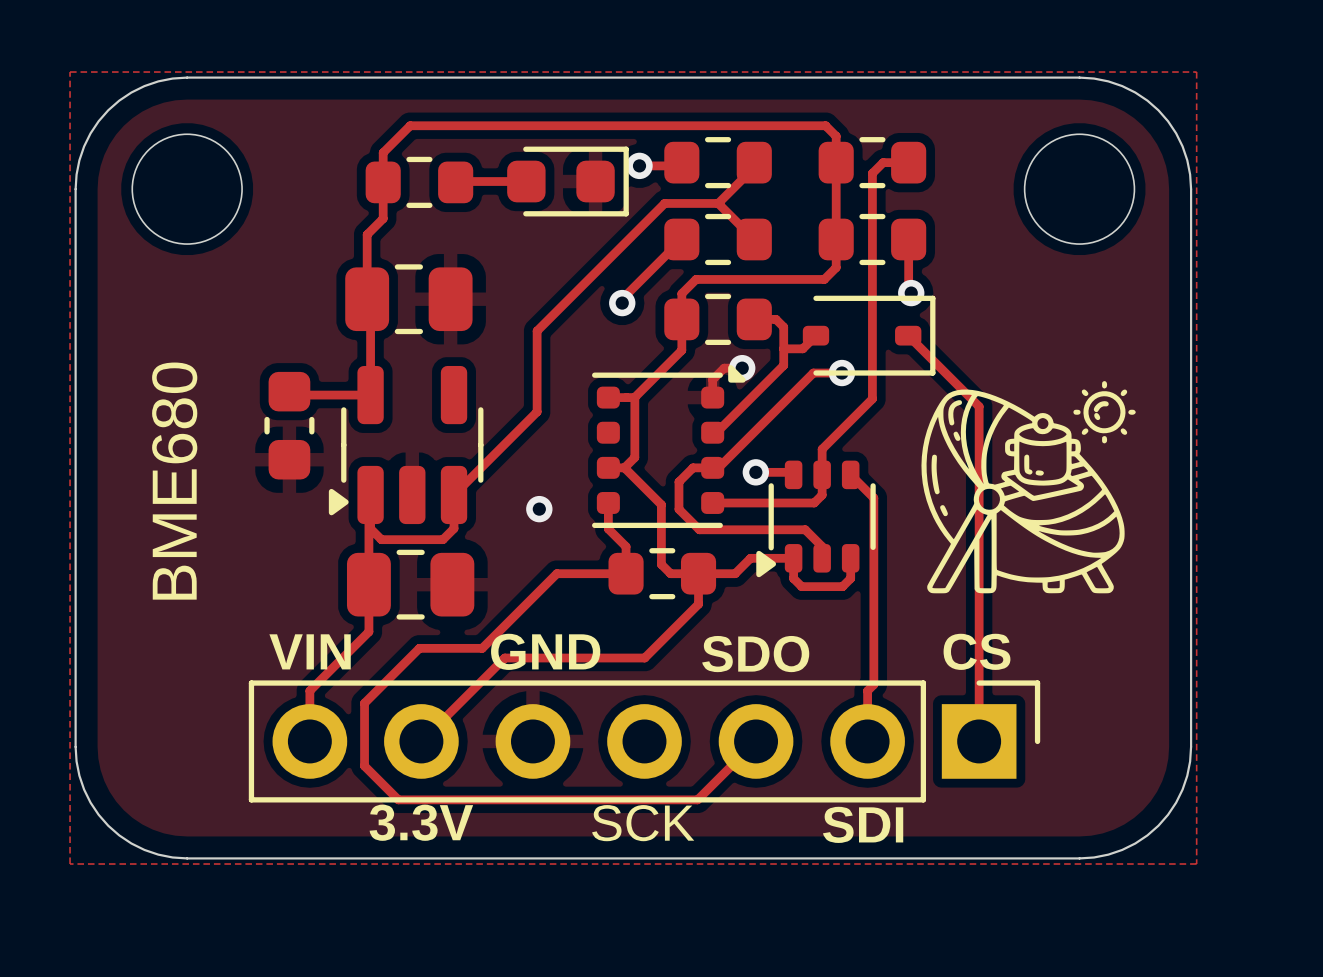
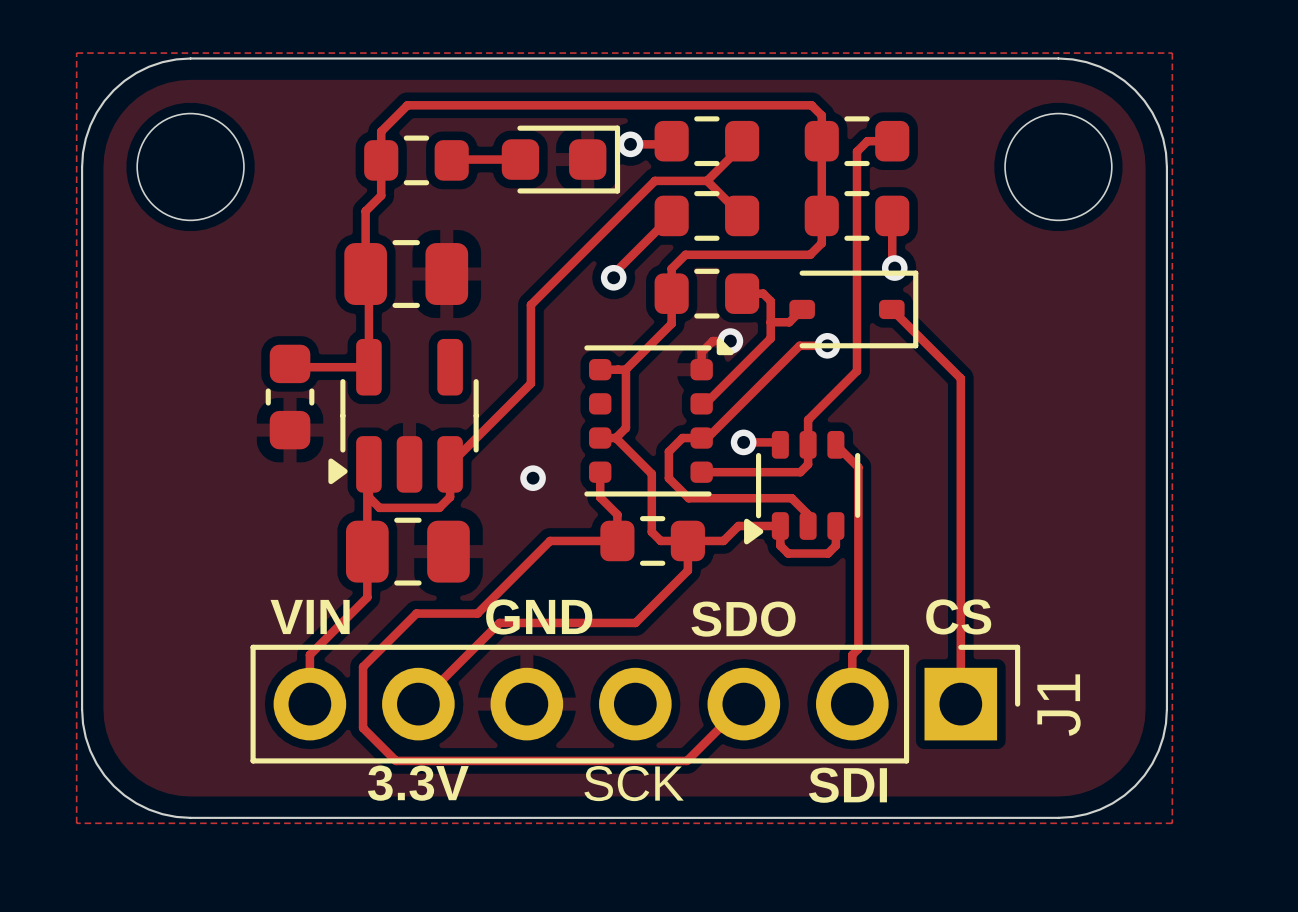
drawing: [921, 381, 1136, 594] -> none
text: BME680 (174, 481) -> none
J1 name: none -> J1 (1059, 705)

